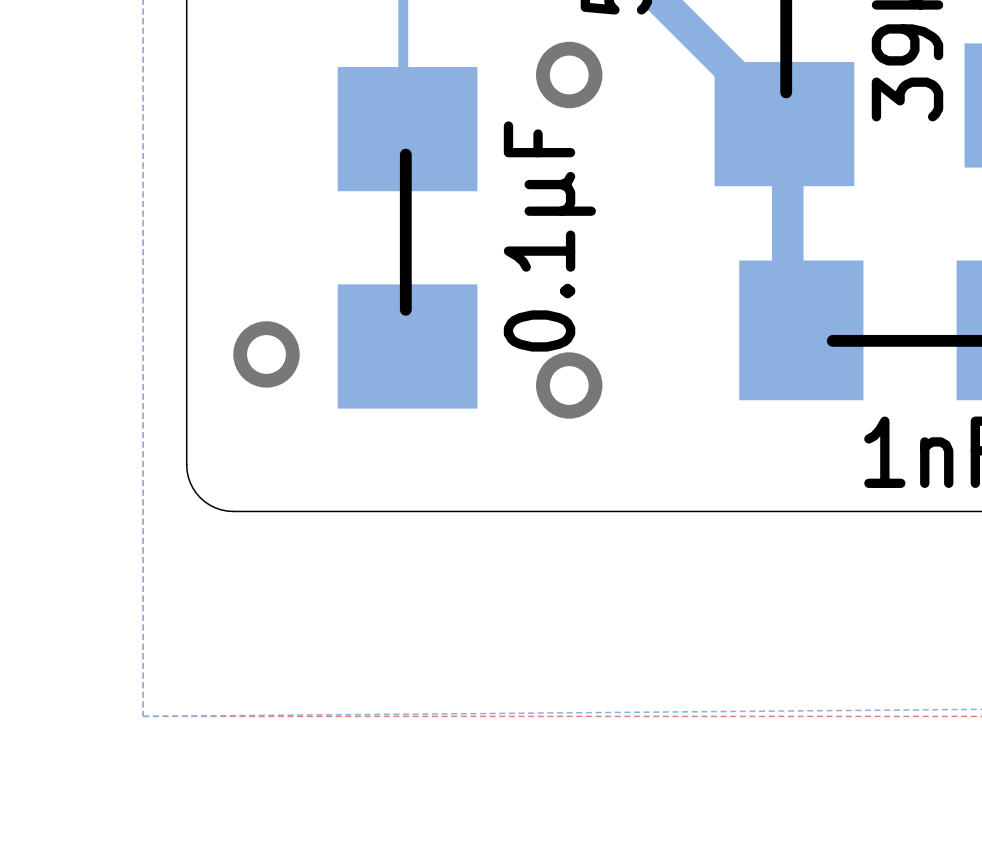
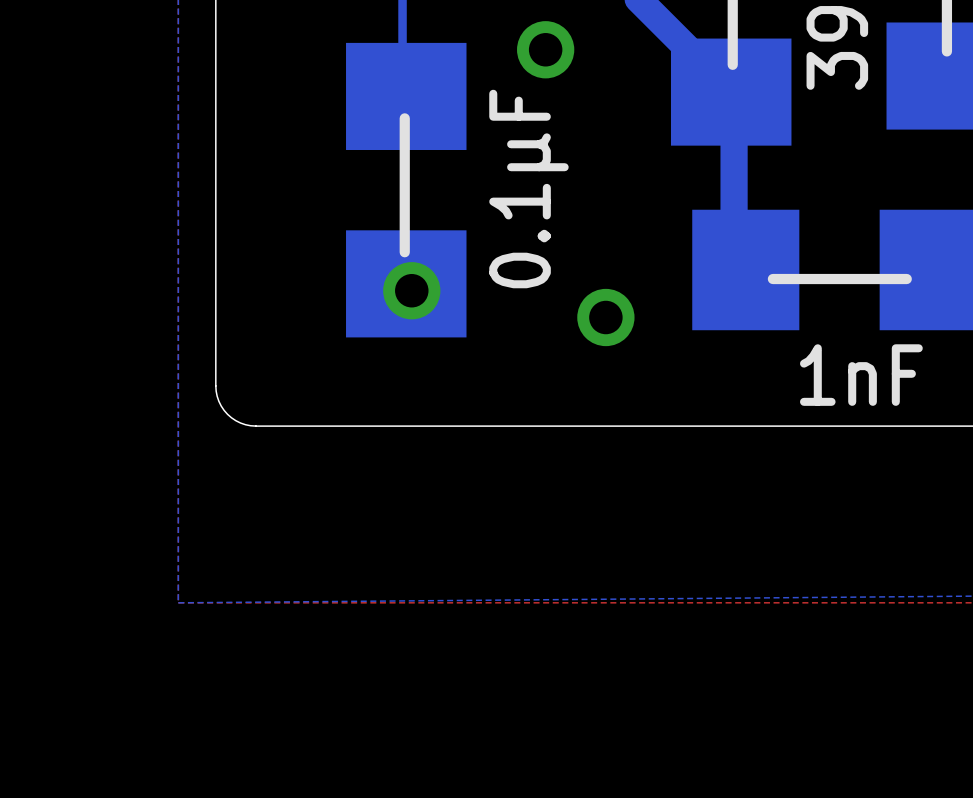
via: (266, 354) -> none
via: none -> (411, 290)
via position: (569, 385) -> (605, 317)

